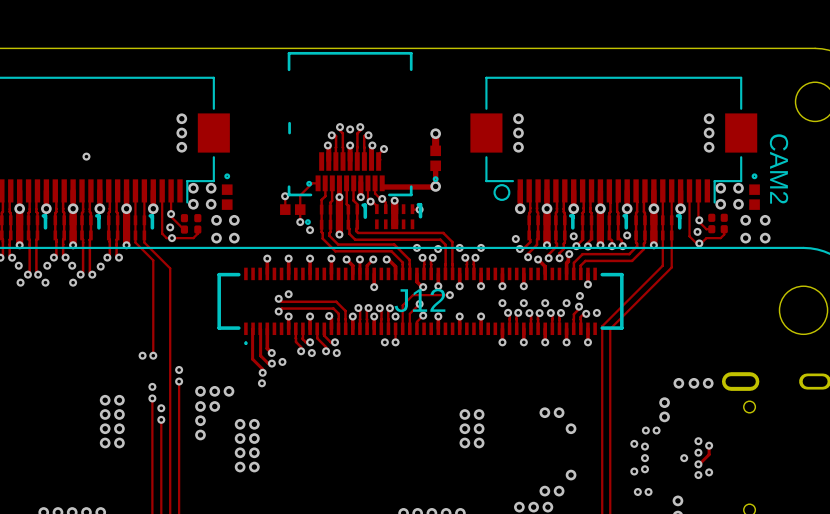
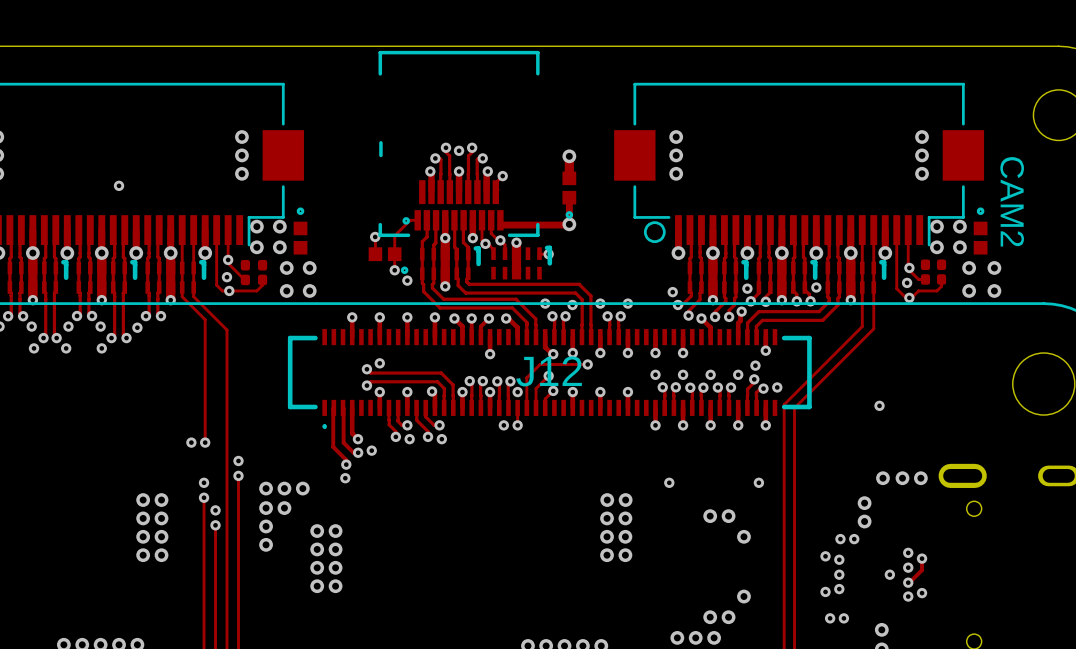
via: none -> (879, 405)
via: none -> (669, 482)
via: none -> (758, 482)
via: none -> (607, 500)
via: none -> (625, 500)

